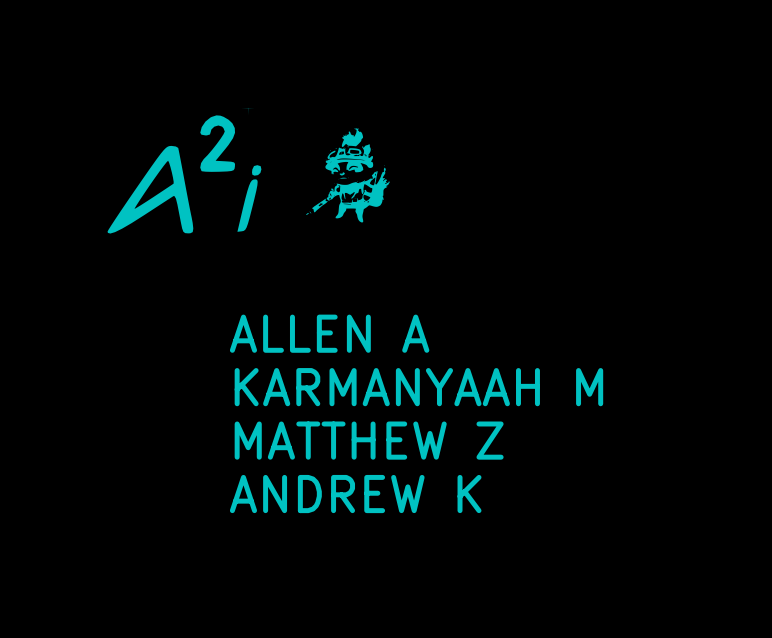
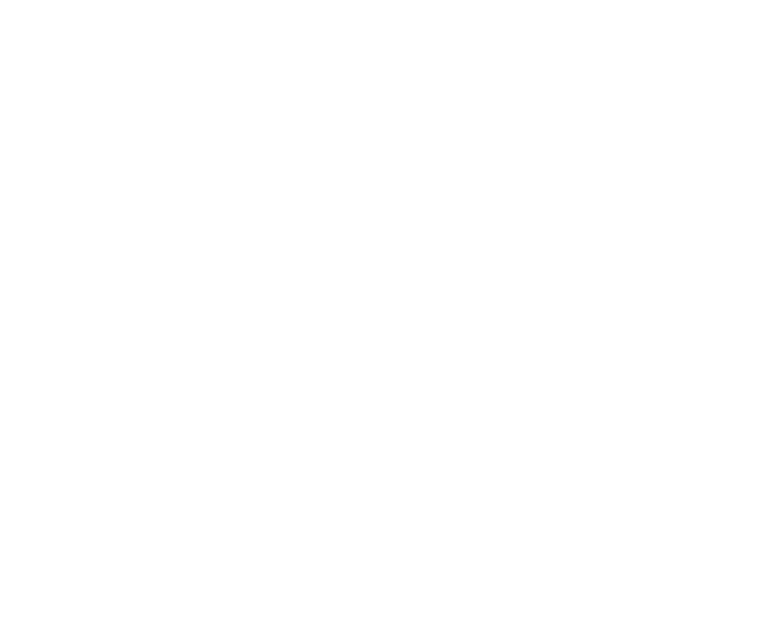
drawing: [107, 107, 390, 234] -> none
text: ALLEN A (329, 333) -> none
text: KARMANYAAH M (418, 387) -> none
text: MATTHEW Z (369, 440) -> none
text: ANDREW K (355, 494) -> none

